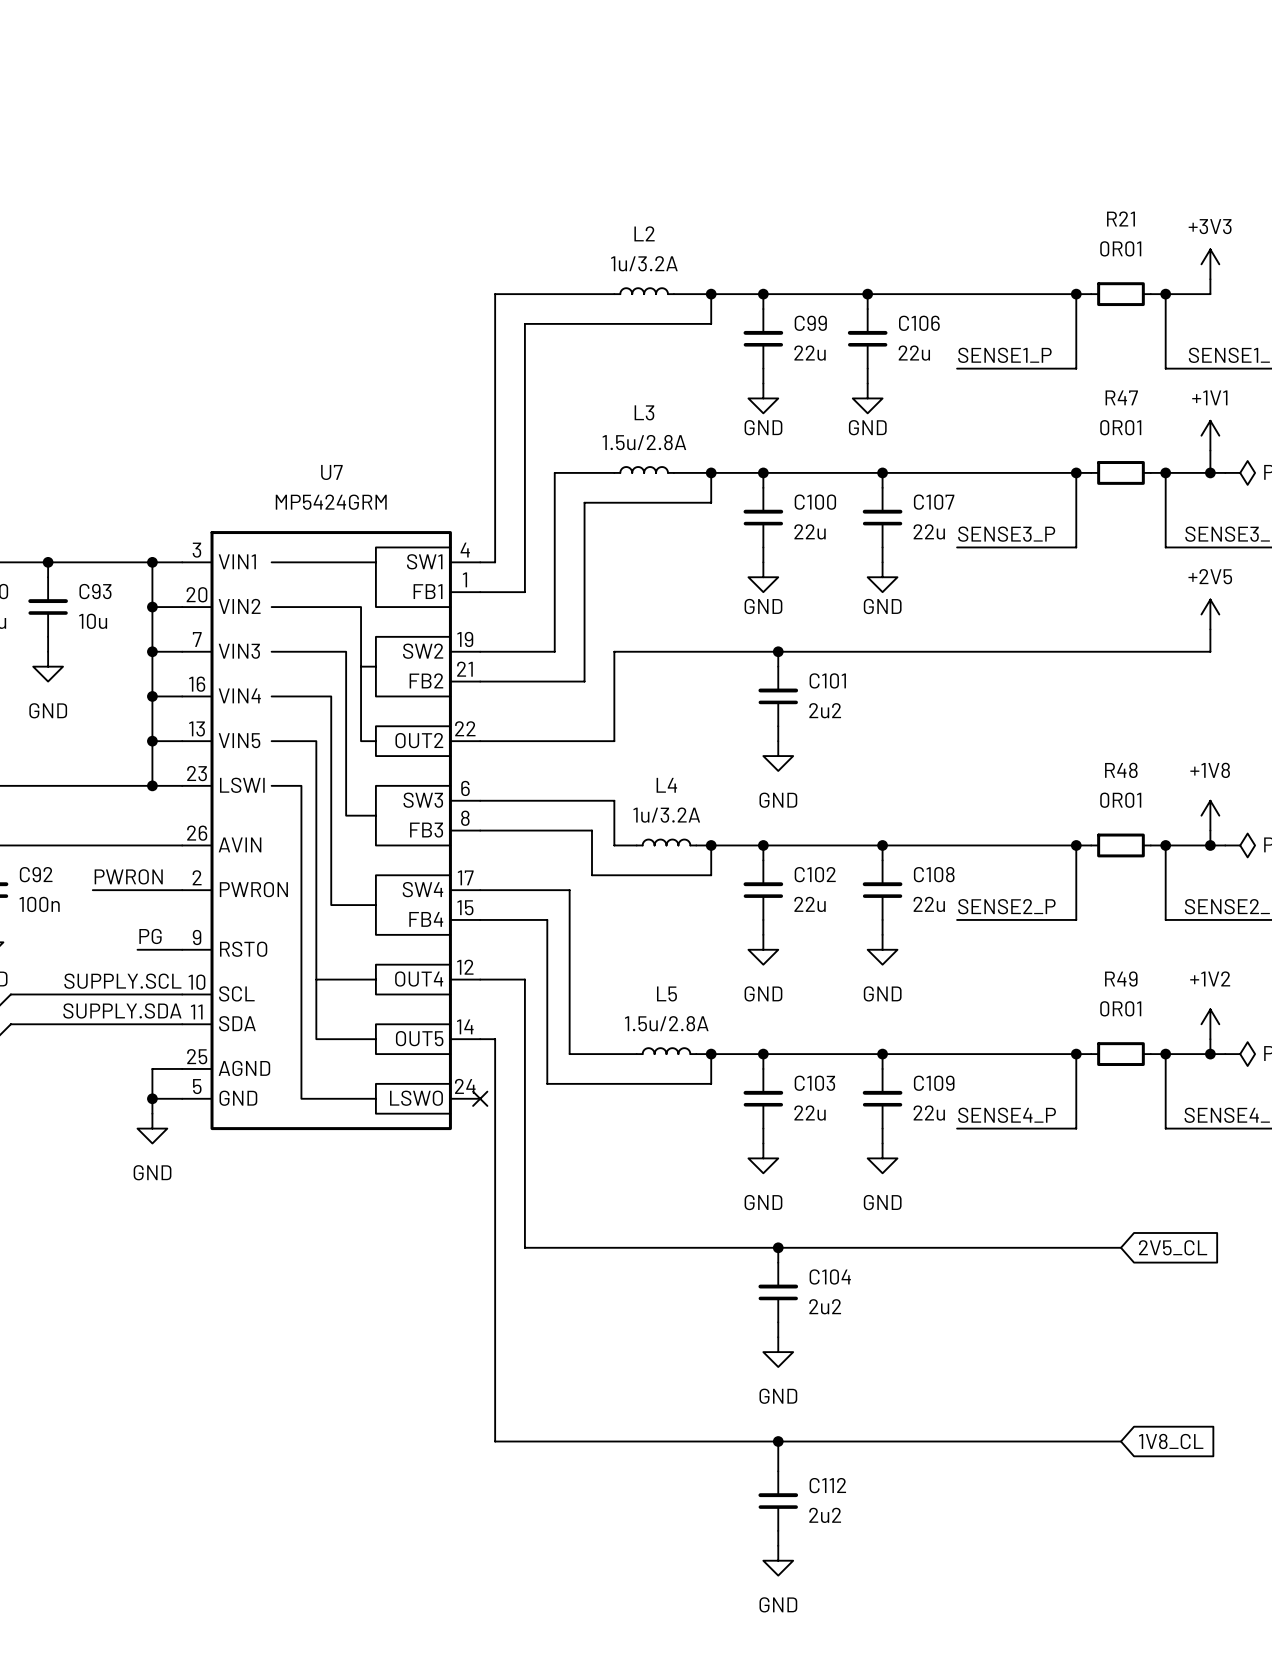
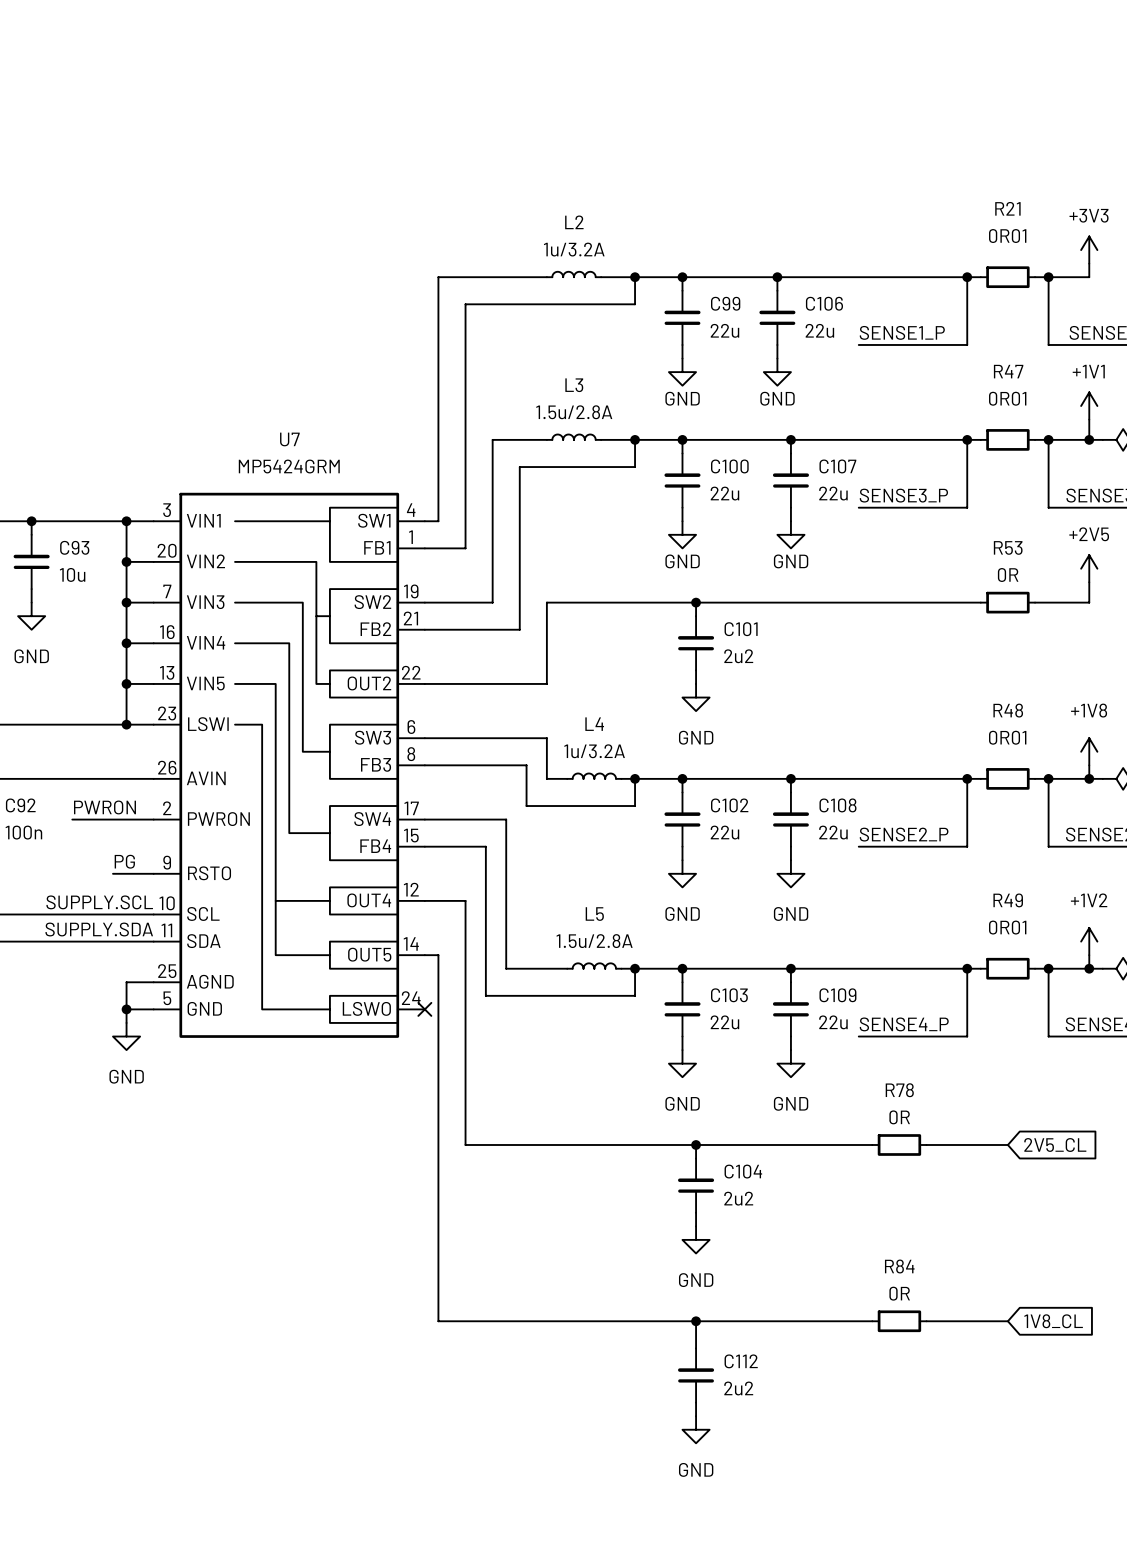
wire: (1091, 651) (1150, 651) -> none
R53: none -> (1007, 602)
wire: (971, 1247) (1031, 1247) -> none
R78: none -> (899, 1144)
wire: (971, 1441) (1031, 1441) -> none
R84: none -> (899, 1321)

